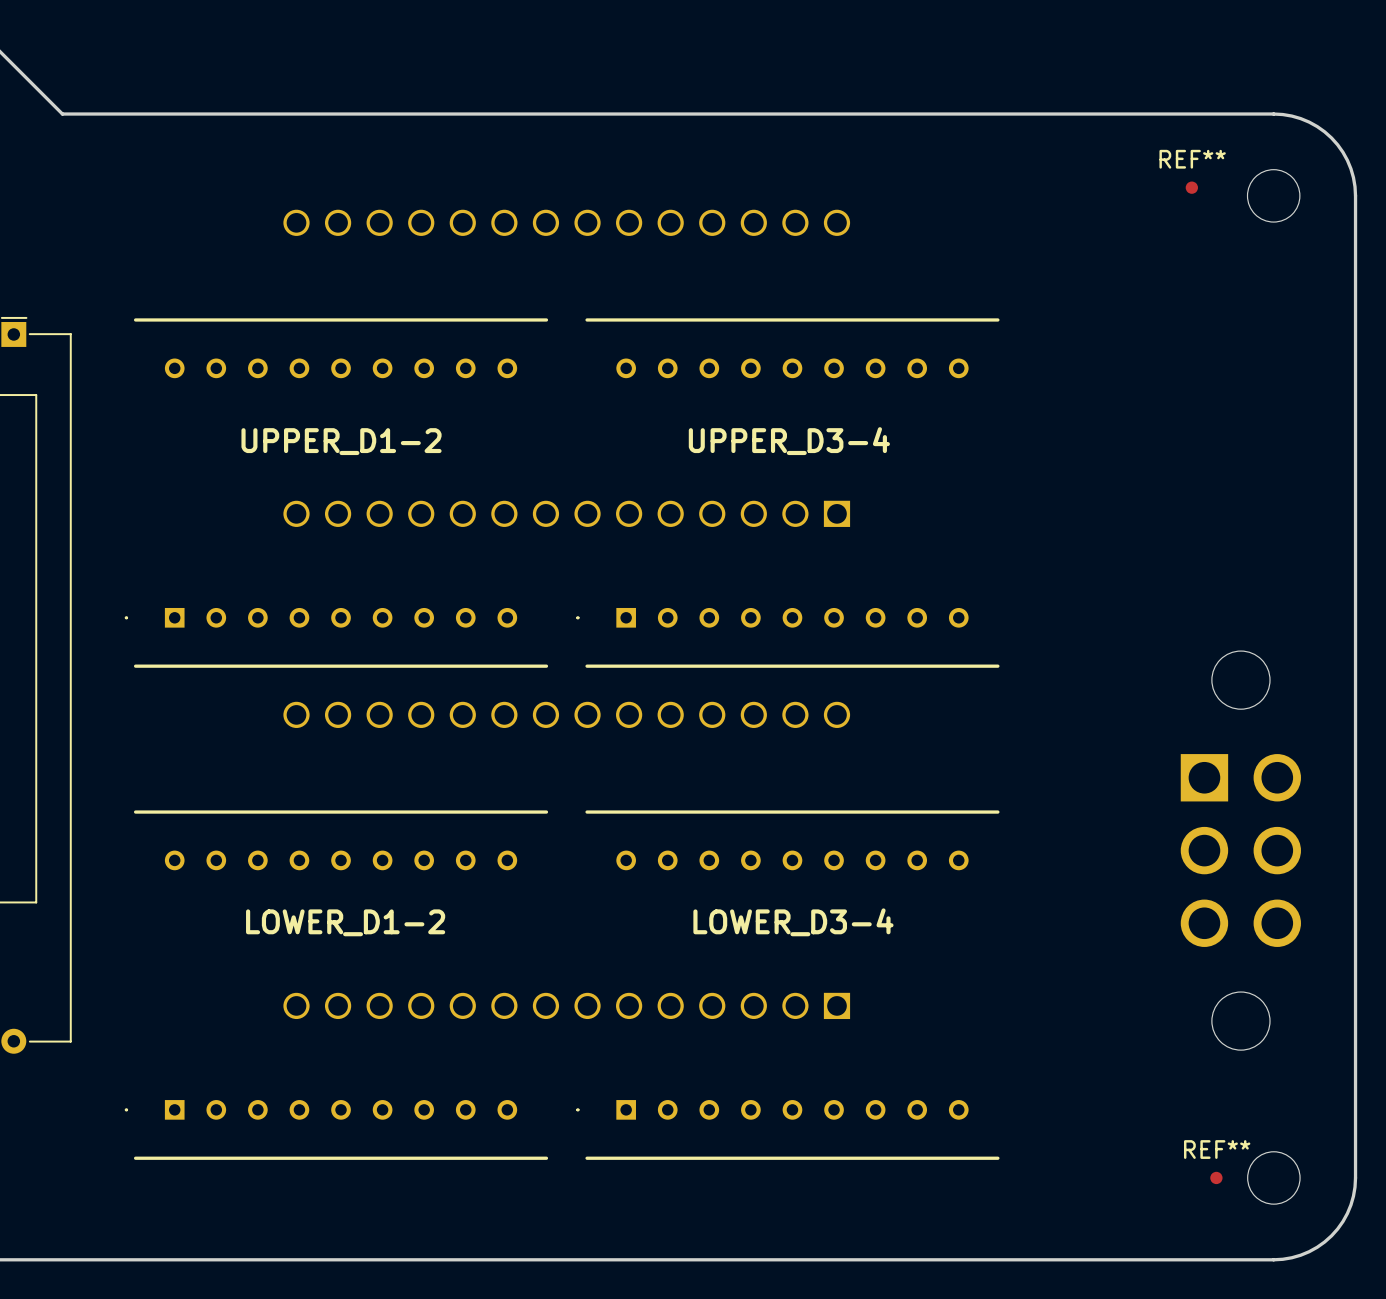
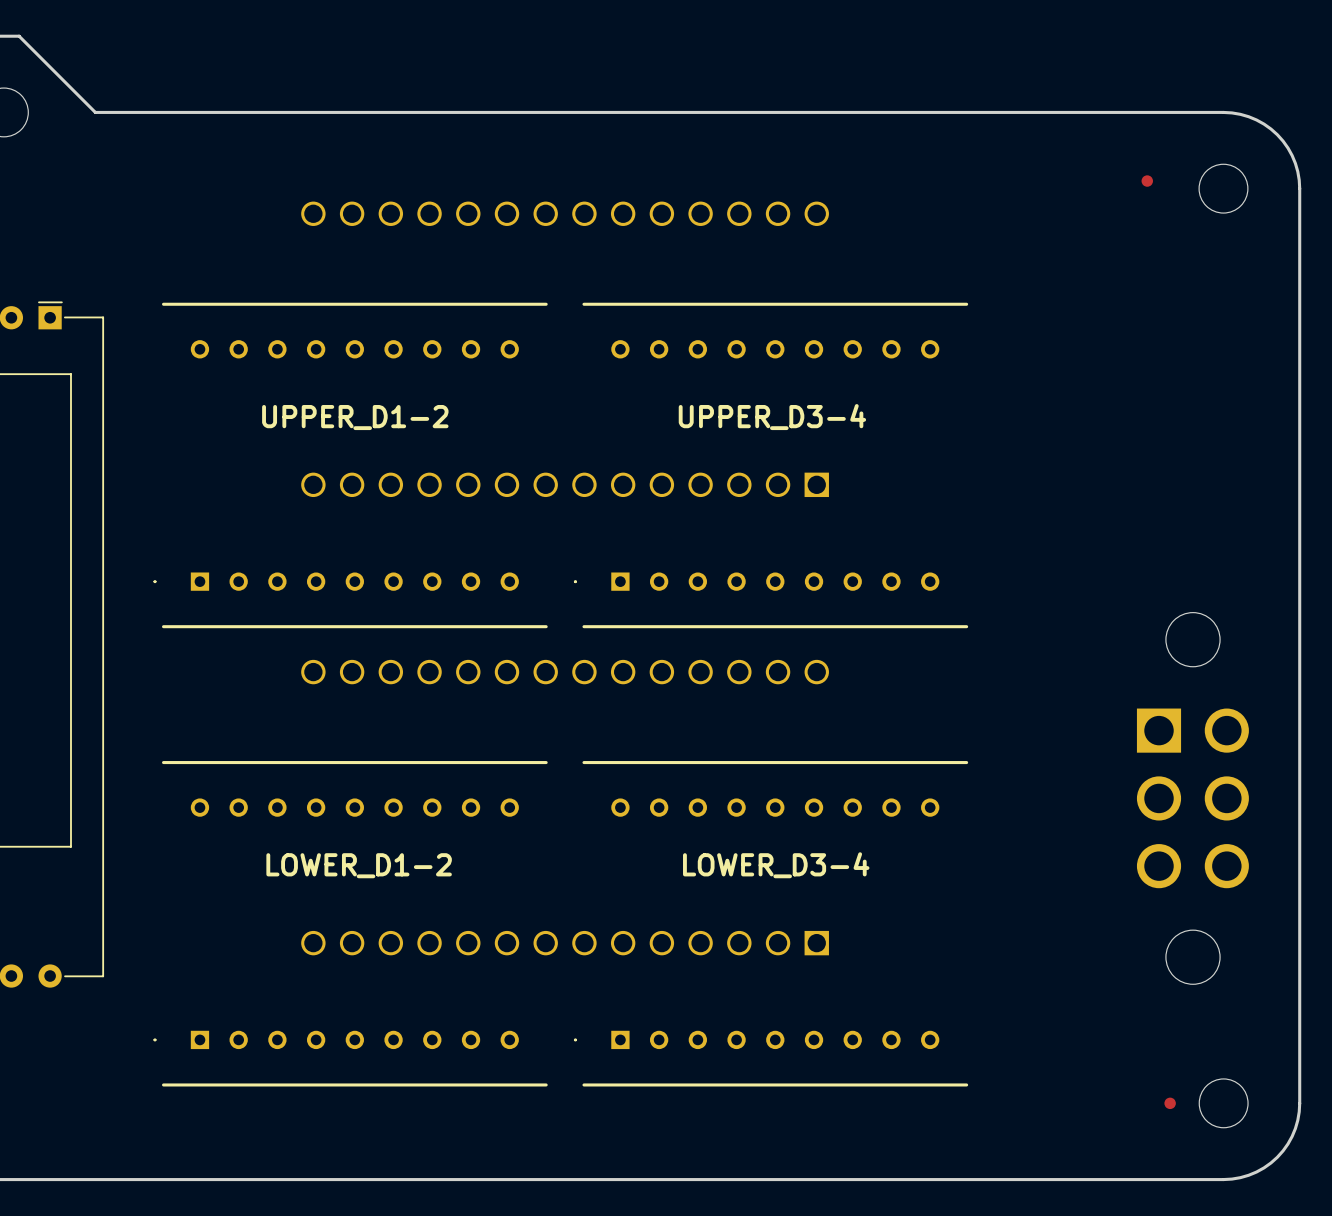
REF** name: REF** (1192, 159) -> none
REF** name: REF** (1217, 1149) -> none

